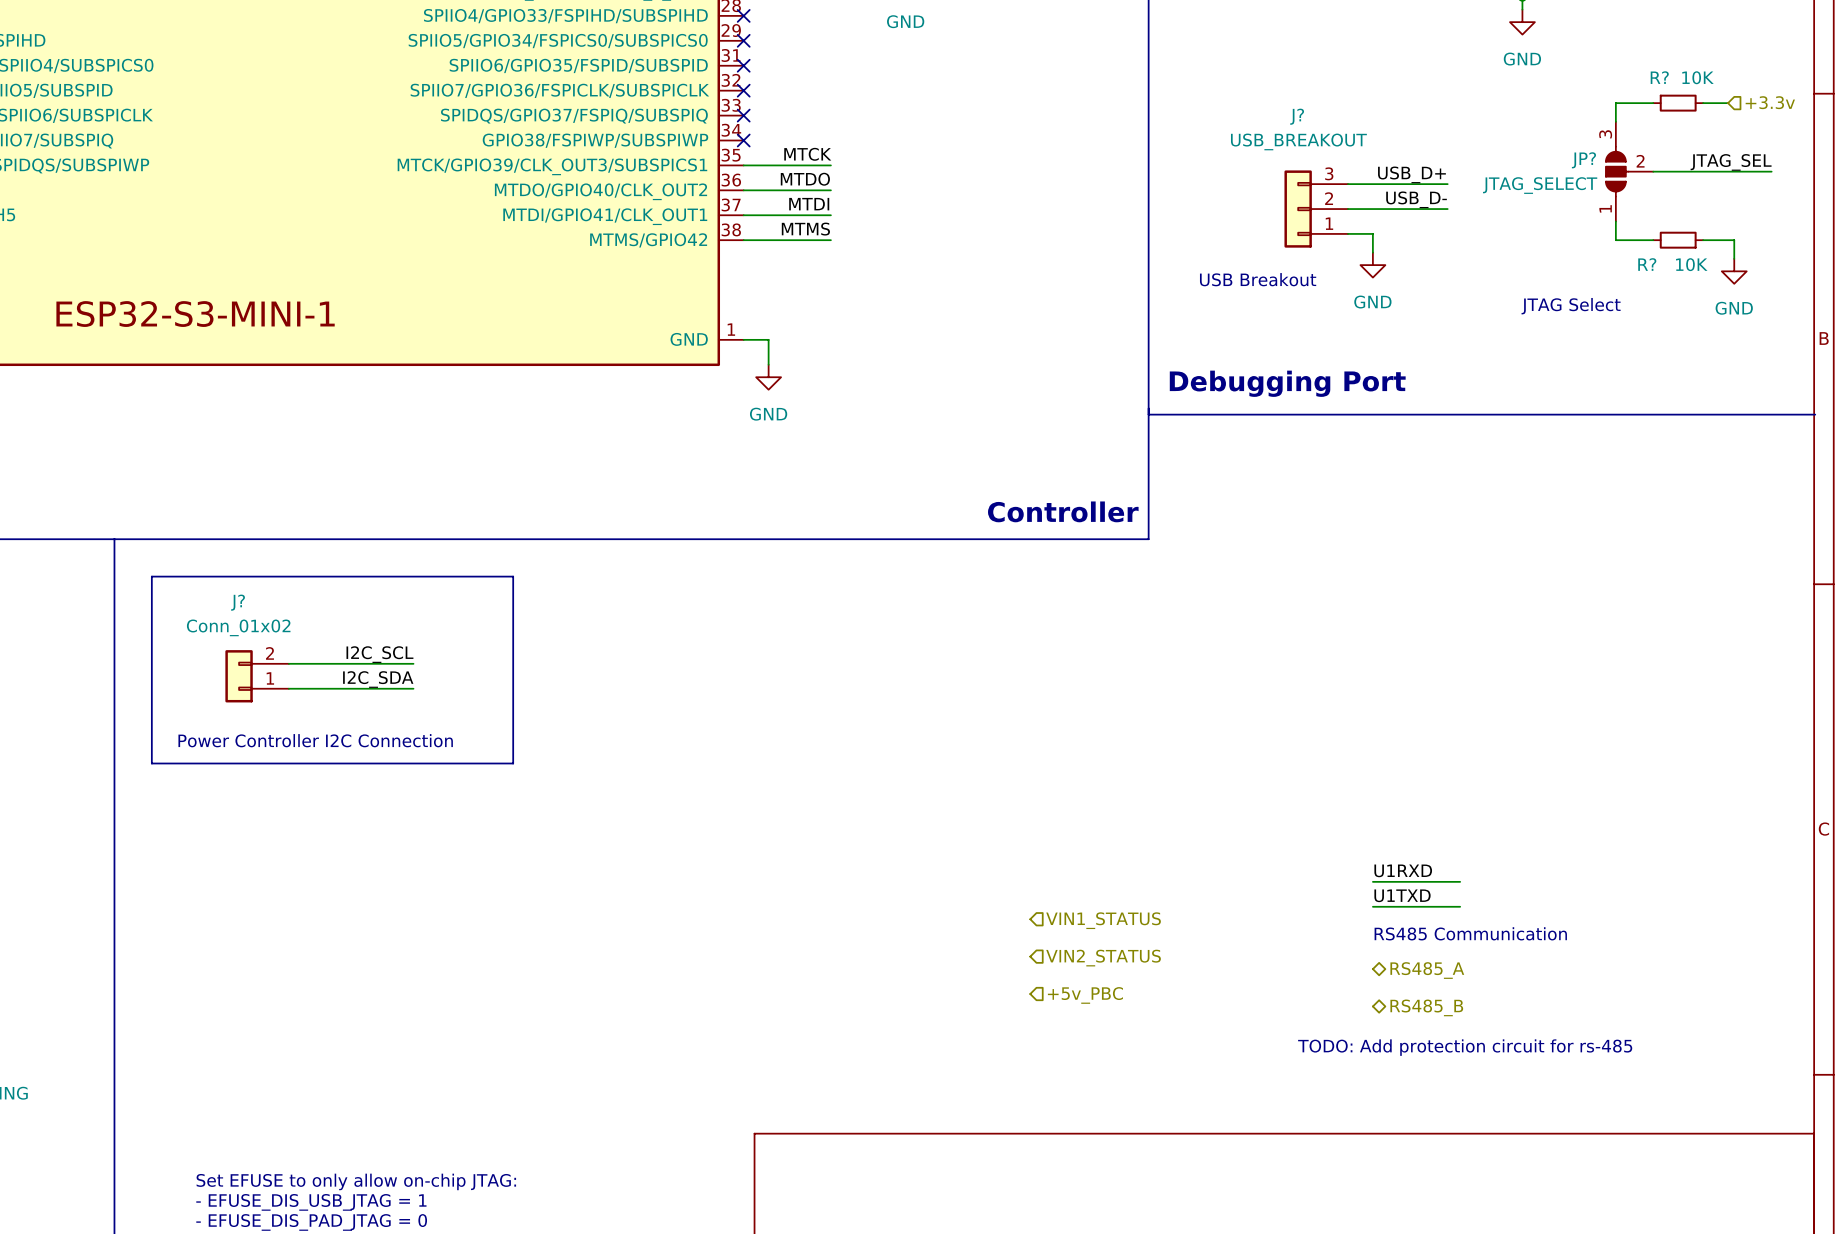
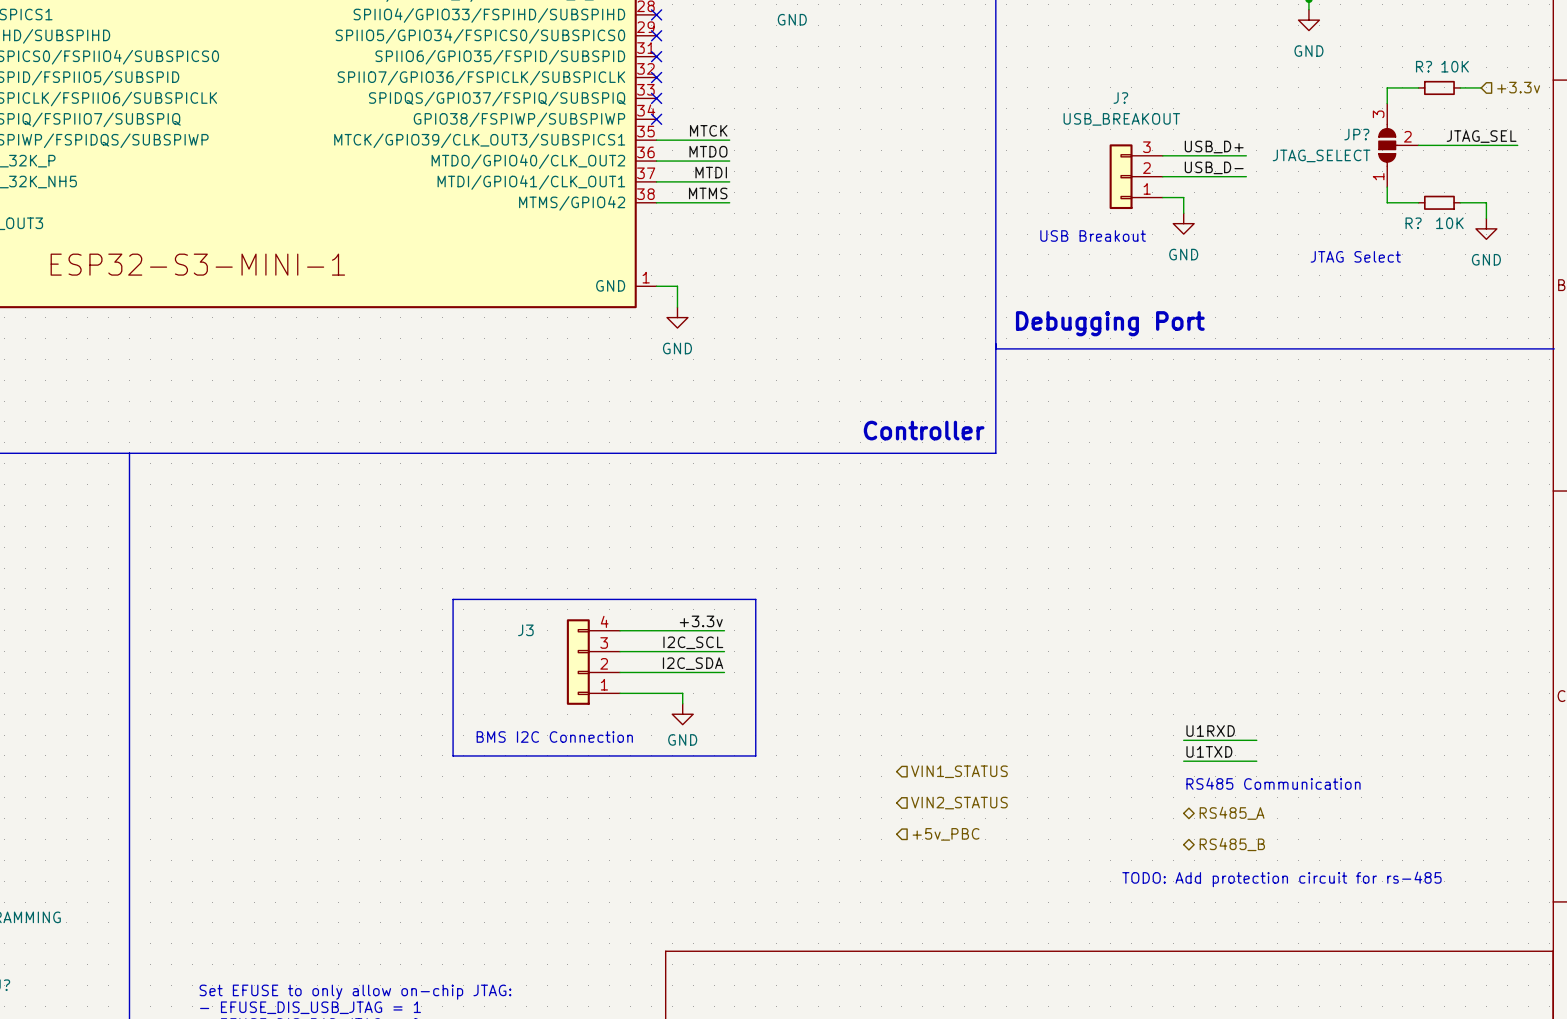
line: (151, 576) (151, 763) (513, 763) (513, 576) (151, 576) -> none
label: I2C_SCL (379, 654) -> none
wire: (288, 663) (413, 663) -> none
J?: Conn_01x02 (257, 676) -> none
label: I2C_SDA (378, 679) -> none
wire: (288, 688) (413, 688) -> none
line: none -> (453, 599) (453, 755) (755, 755) (755, 599) (453, 599)
label: none -> +3.3v (701, 621)
text: Power Controller I2C Connection (315, 740) -> none
wire: none -> (620, 630) (724, 630)
label: none -> I2C_SCL (693, 642)
wire: none -> (620, 651) (724, 651)
J3: none -> (593, 662)
label: none -> I2C_SDA (693, 663)
wire: none -> (620, 672) (724, 672)
wire: none -> (620, 693) (682, 693) (682, 703)
power symbol: none -> GND (682, 714)
text: none -> BMS I2C Connection (554, 736)

